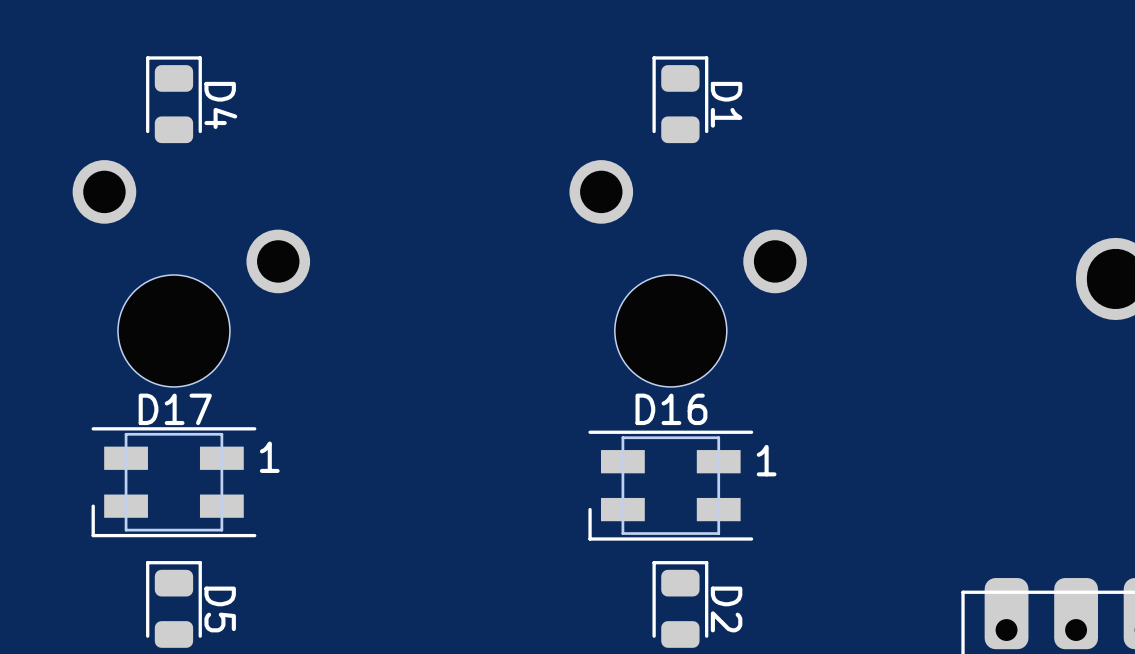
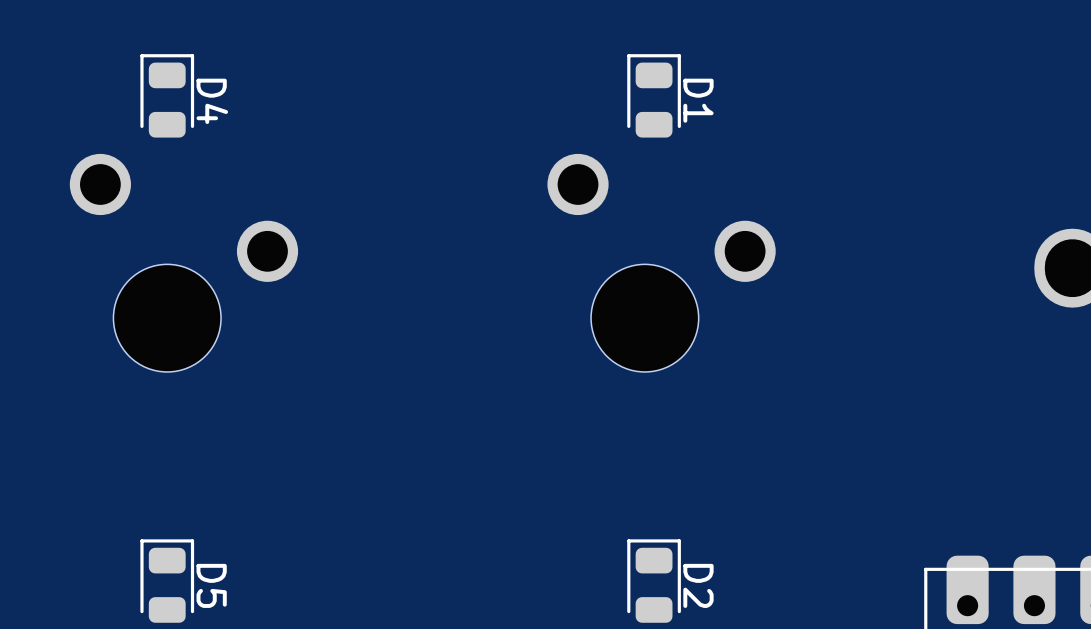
board edge: (221, 434) (126, 434) (126, 530) (221, 530) (221, 434) -> none
board edge: (718, 437) (622, 437) (622, 533) (718, 533) (718, 437) -> none
D17: (173, 482) -> none
D16: (670, 485) -> none

